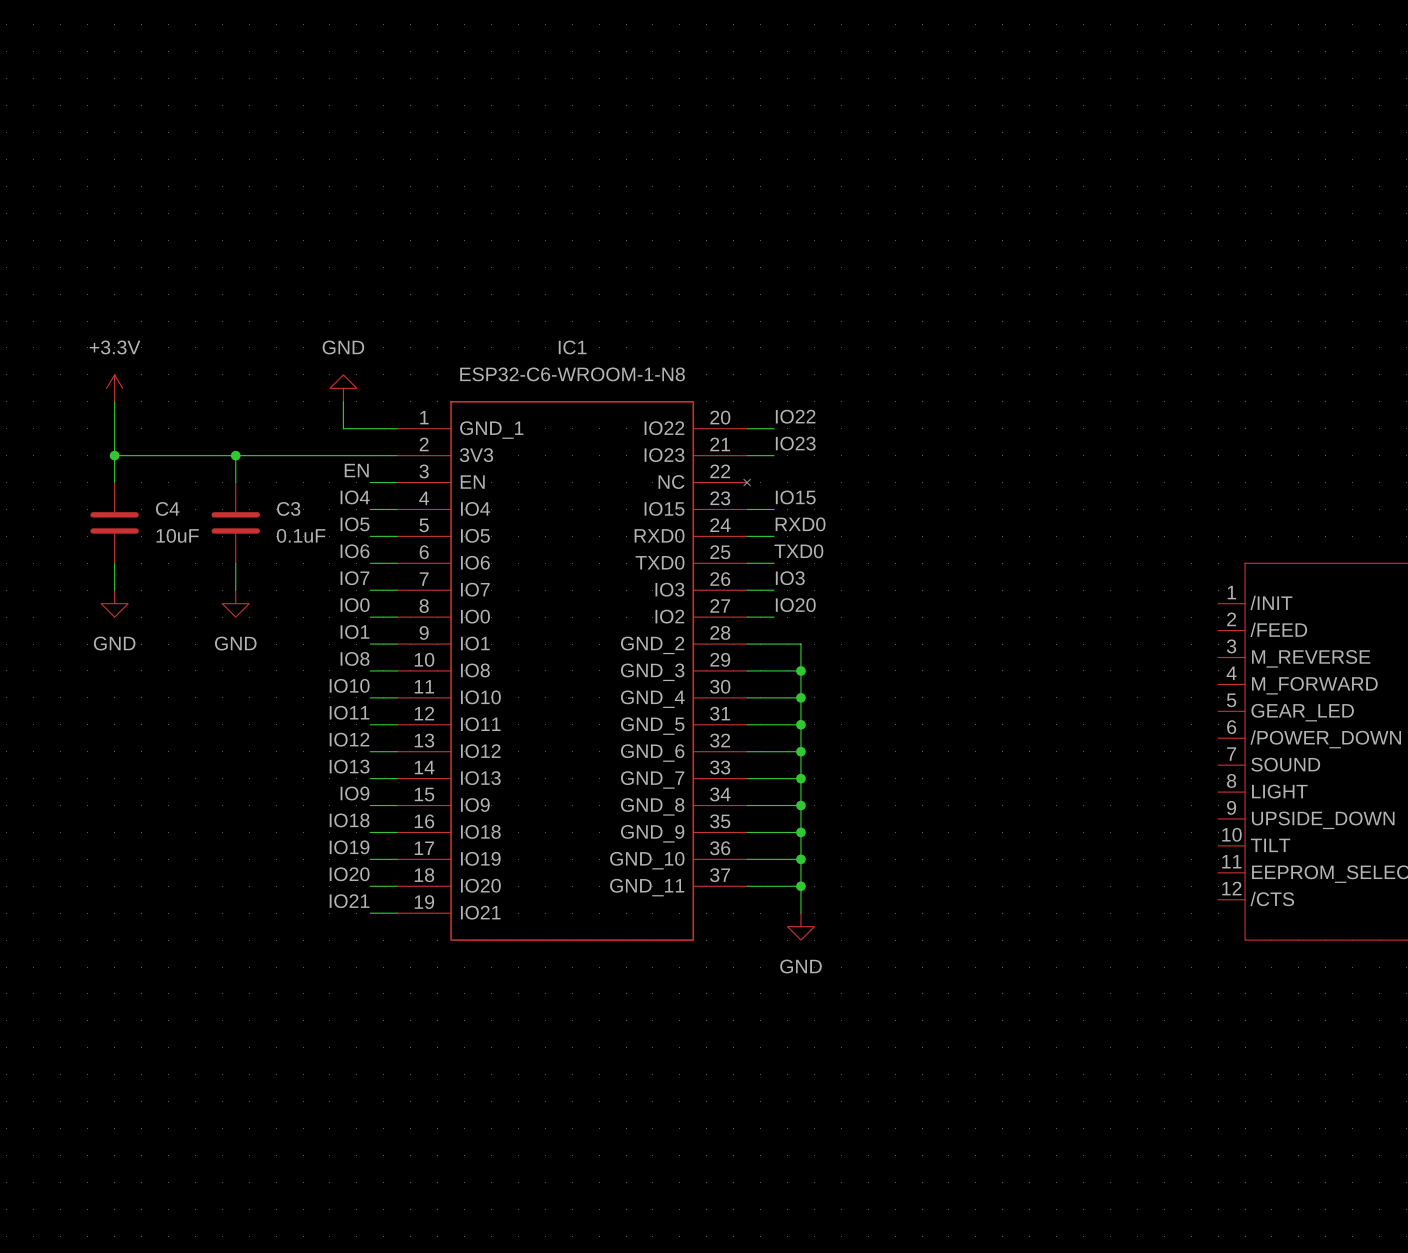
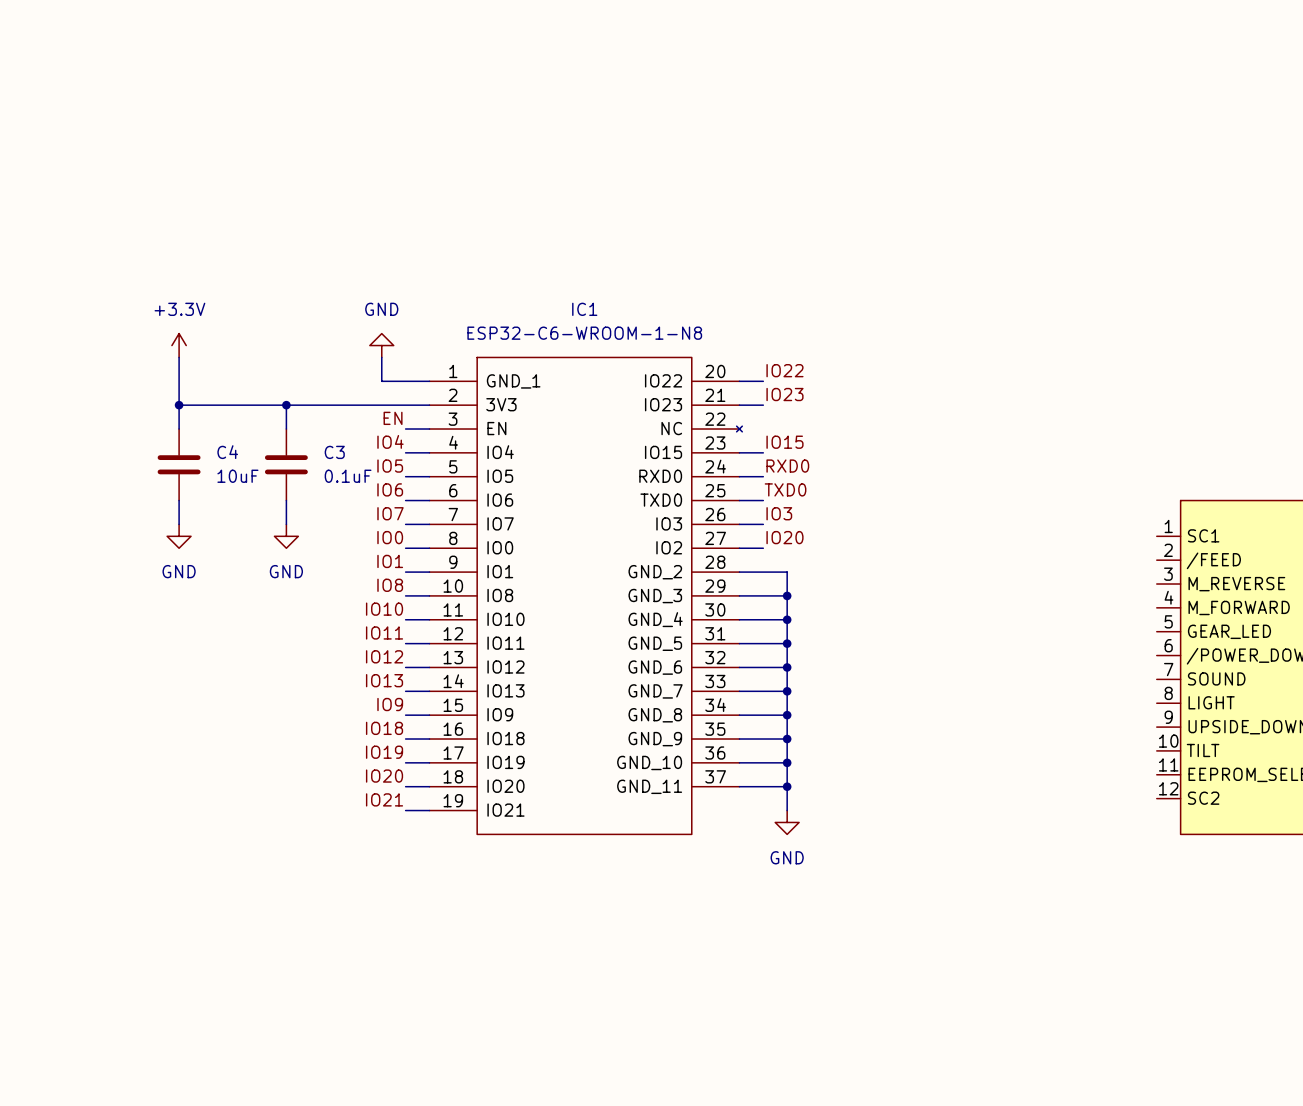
part pin name: /INIT (1271, 602) -> SC1 (1203, 535)
part pin name: /CTS (1272, 898) -> SC2 (1203, 798)

